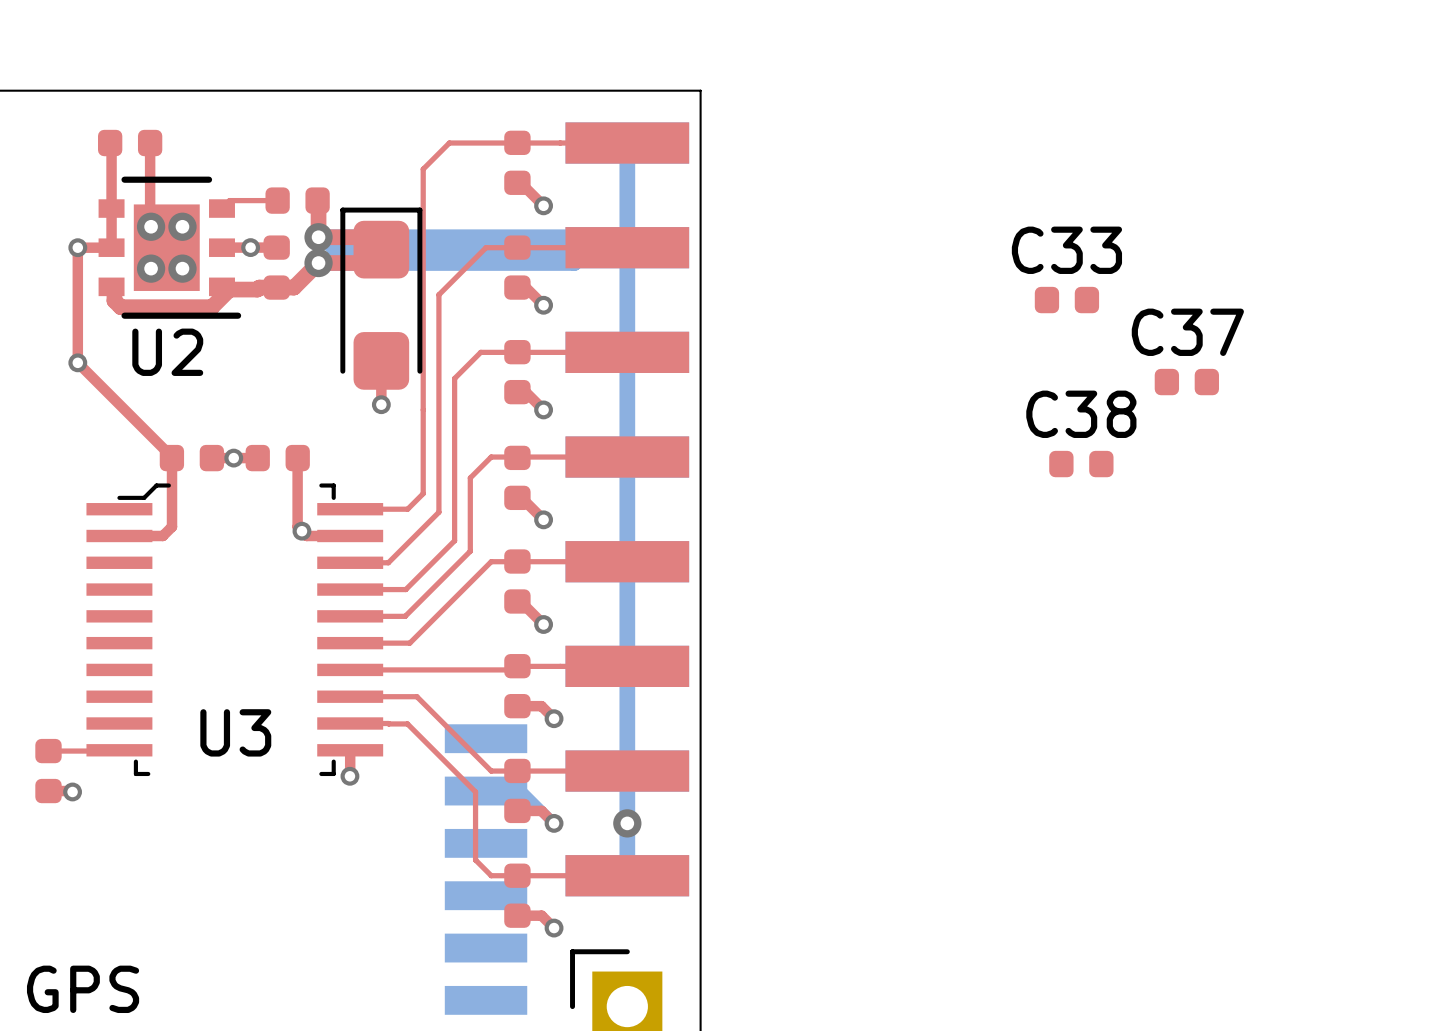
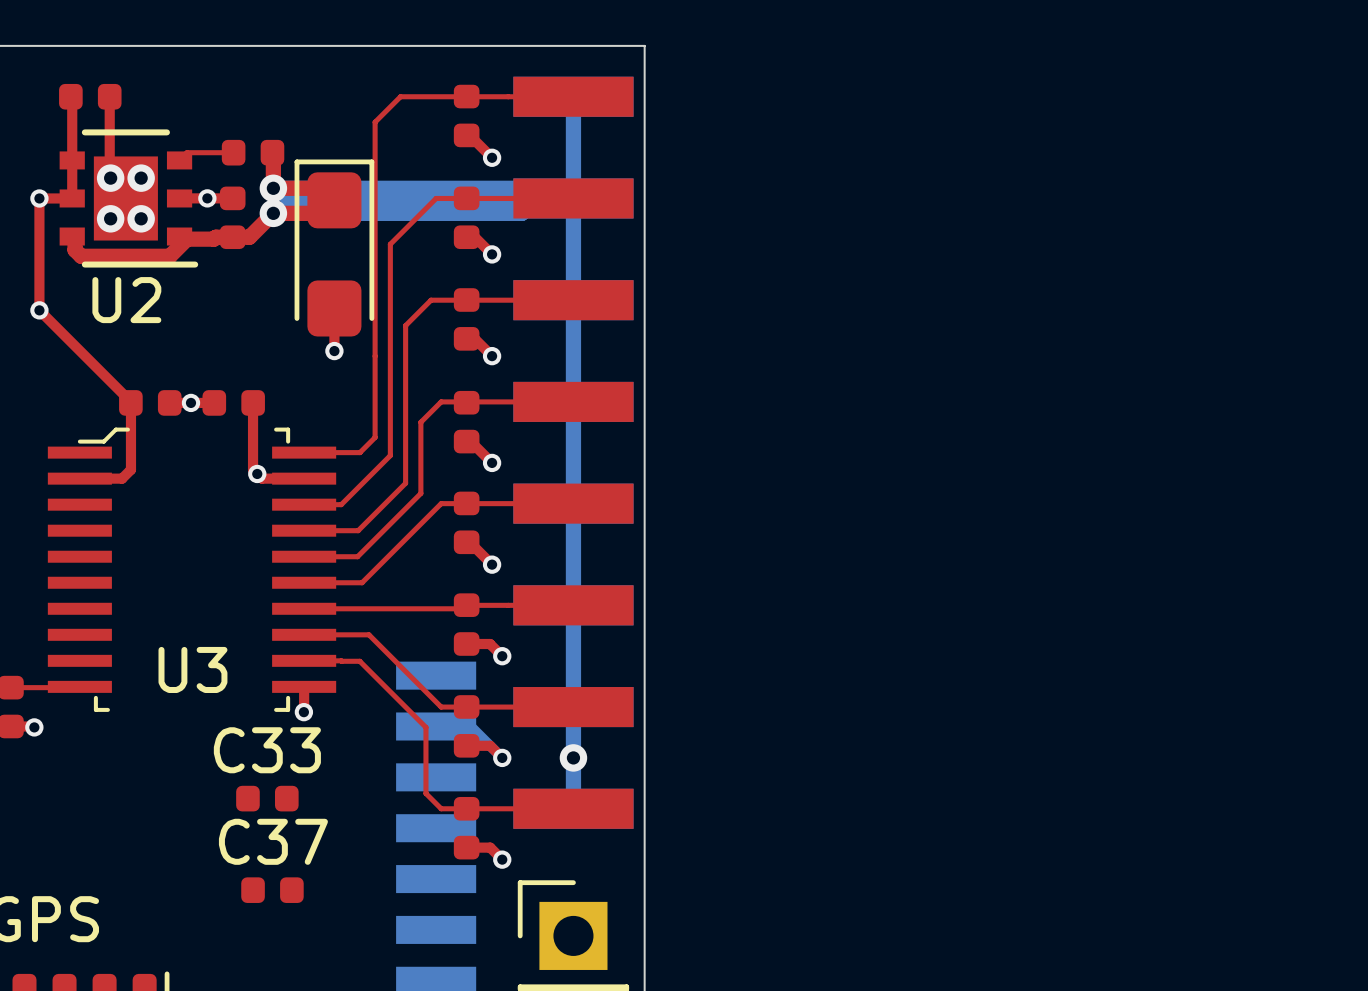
C33 position: (1066, 300) -> (267, 798)
C37 position: (1186, 382) -> (272, 890)
C38: (1081, 464) -> none

